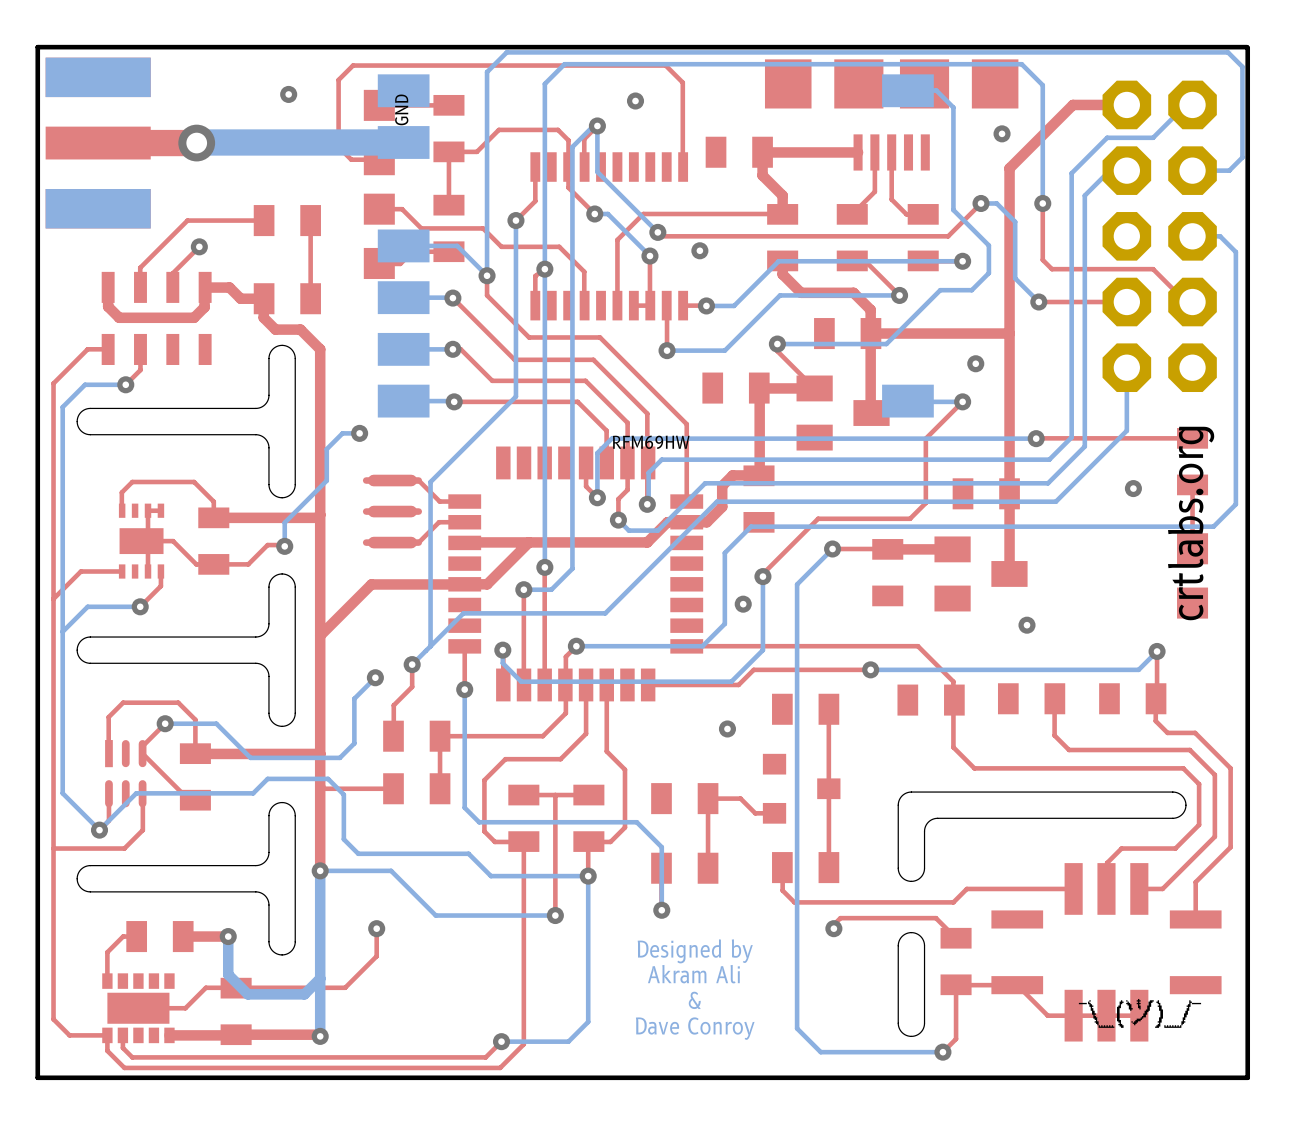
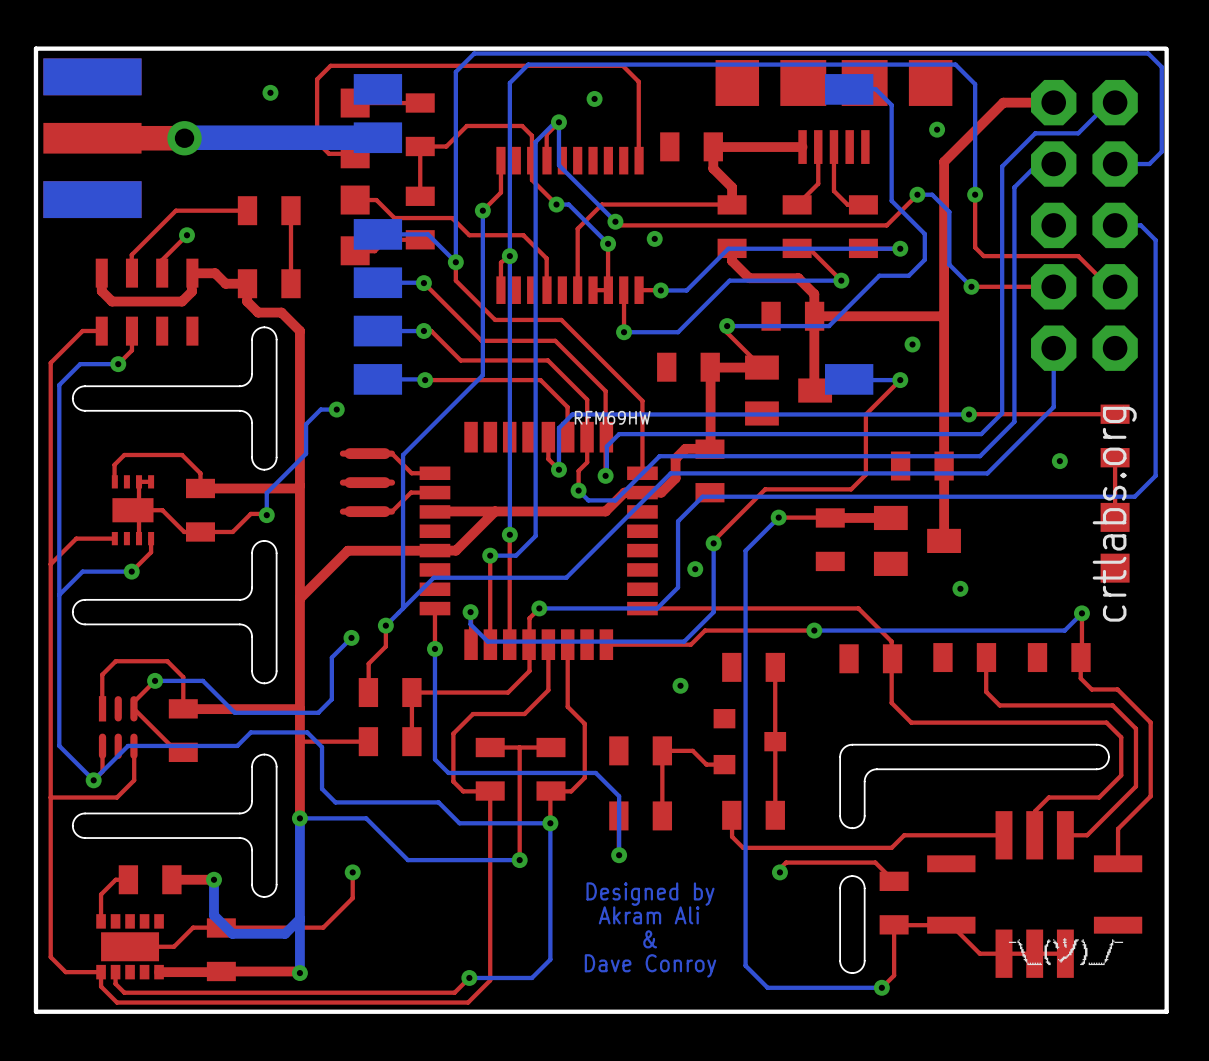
text: GND (401, 109) -> none

